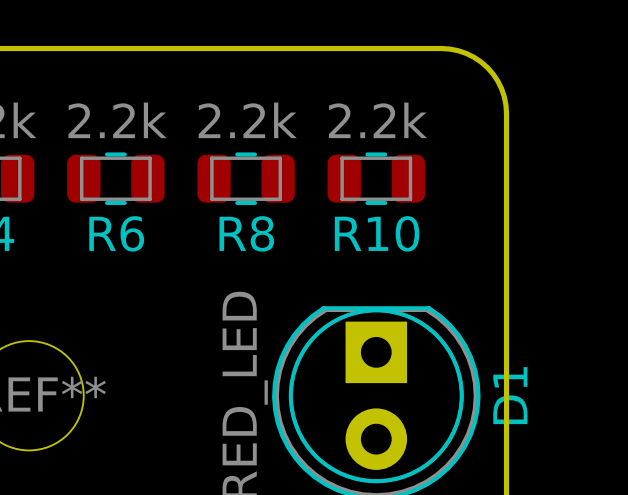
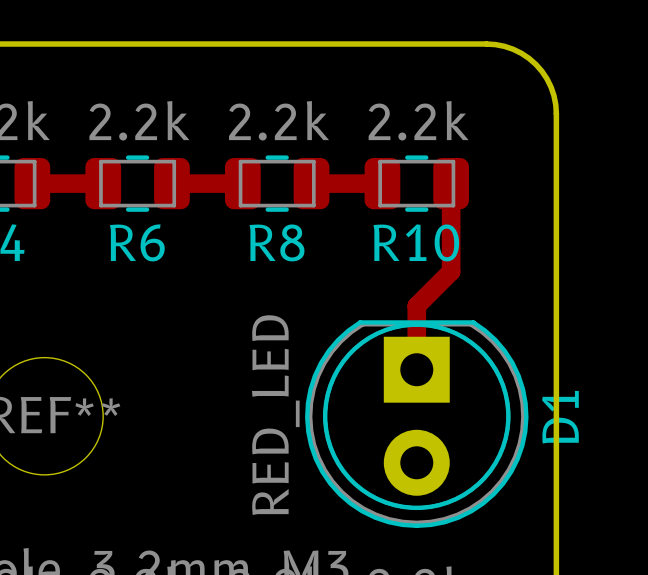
track: none -> (32, 183) (103, 183)
track: none -> (171, 183) (242, 183)
track: none -> (311, 183) (382, 183)
track: none -> (451, 183) (451, 271) (416, 305) (416, 369)

